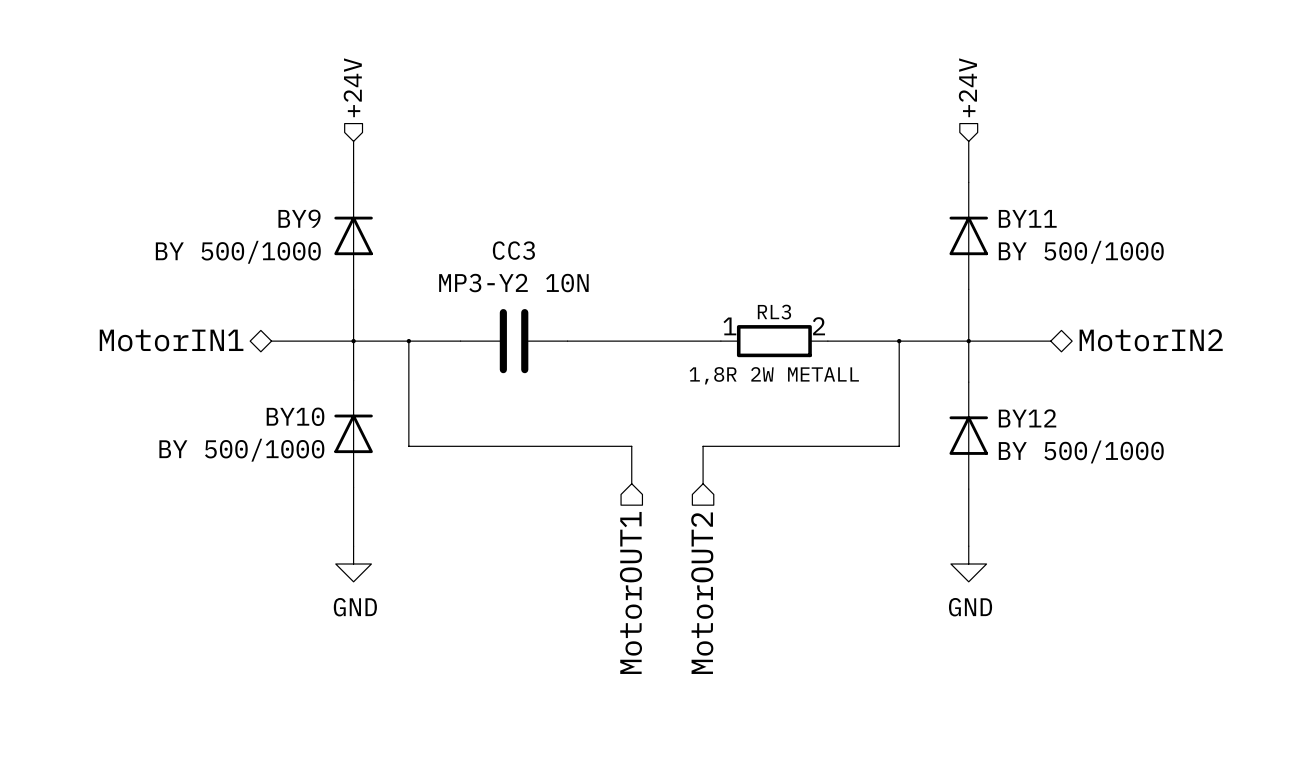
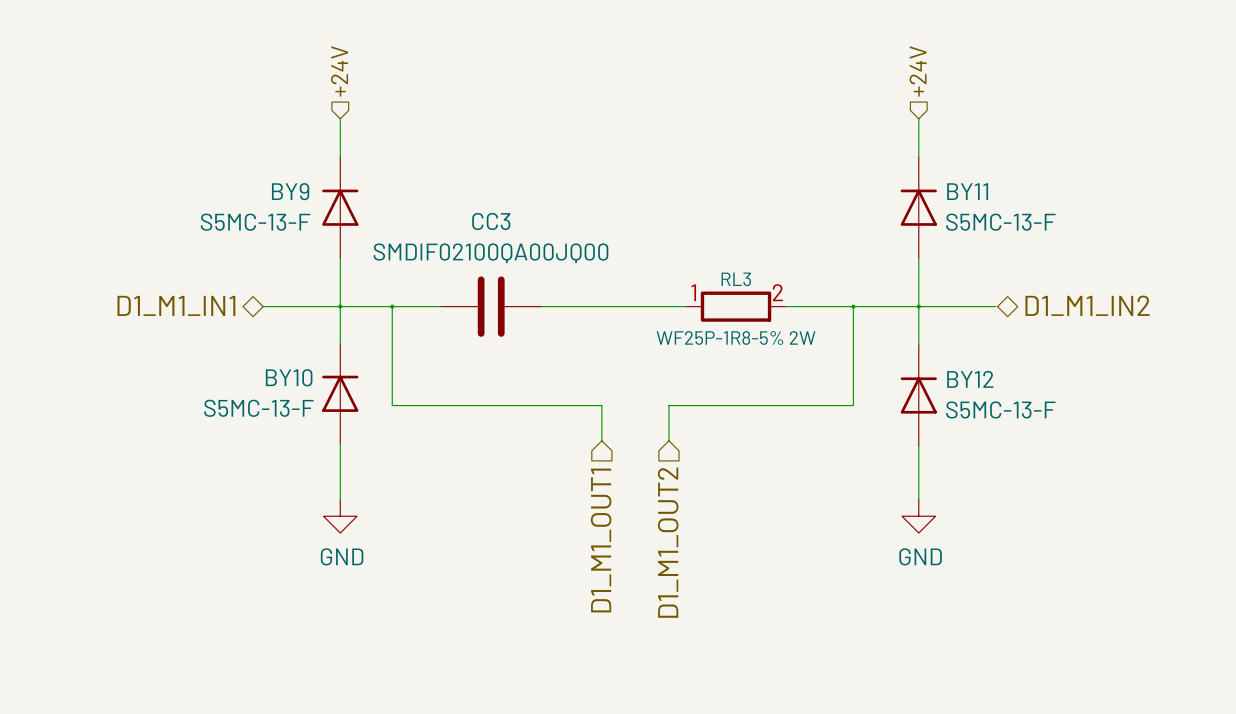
BY9 value: BY 500/1000 (238, 252) -> S5MC-13-F (255, 222)
BY11 value: BY 500/1000 (1081, 252) -> S5MC-13-F (1000, 222)
CC3 value: MP3-Y2 10N (513, 283) -> SMDIF02100QA00JQ00 (490, 253)
hierarchical label: MotorIN1 (171, 340) -> D1_M1_IN1 (176, 305)
hierarchical label: MotorIN2 (1151, 340) -> D1_M1_IN2 (1087, 305)
RL3 value: 1,8R 2W METALL (774, 375) -> WF25P-1R8-5% 2W (736, 337)
BY10 value: BY 500/1000 (241, 450) -> S5MC-13-F (258, 408)
BY12 value: BY 500/1000 (1081, 451) -> S5MC-13-F (1000, 409)
hierarchical label: MotorOUT1 (630, 592) -> D1_M1_OUT1 (601, 540)
hierarchical label: MotorOUT2 (702, 593) -> D1_M1_OUT2 (668, 542)

